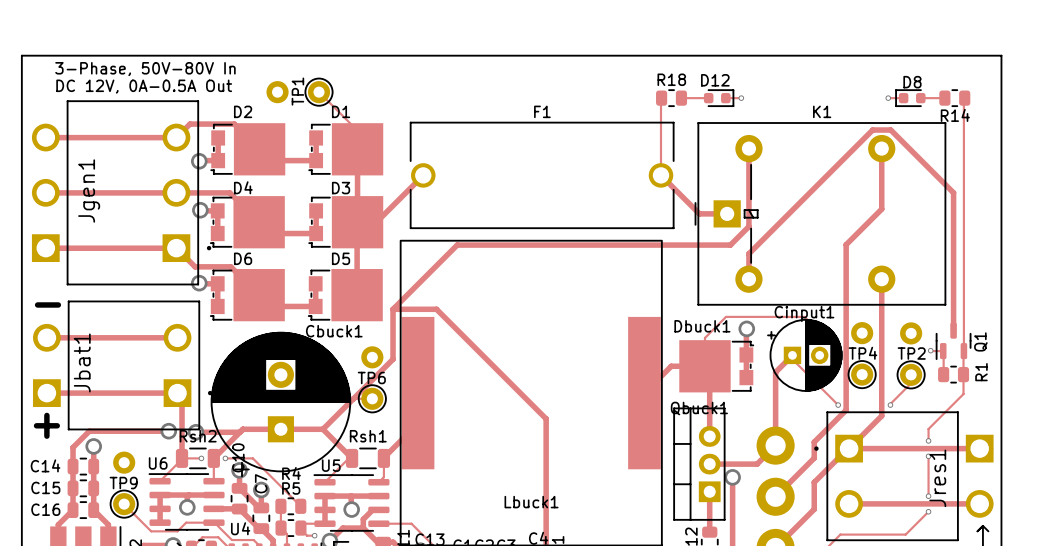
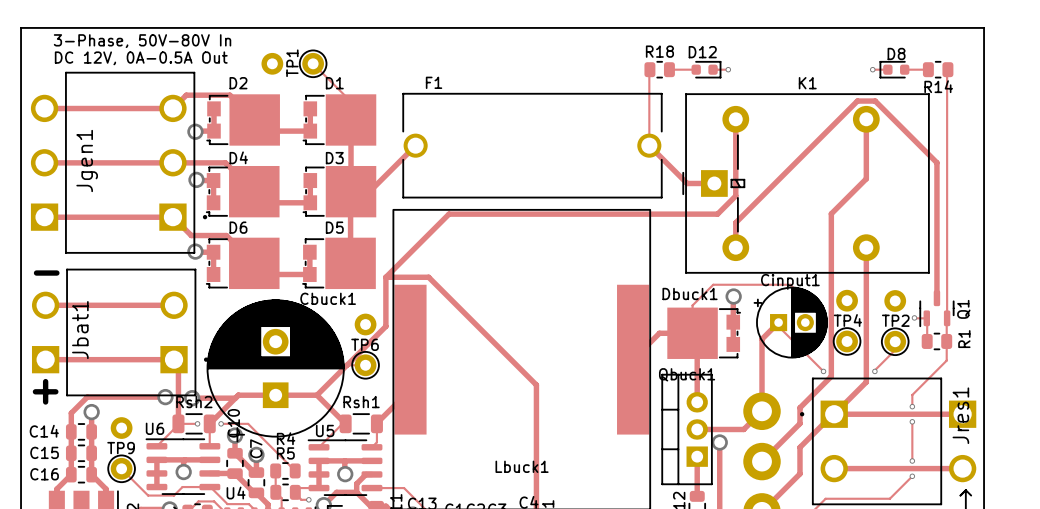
F1 name position: F1 (542, 111) -> F1 (434, 82)
Jres1 name position: Jres1 (937, 478) -> Jres1 (960, 415)

